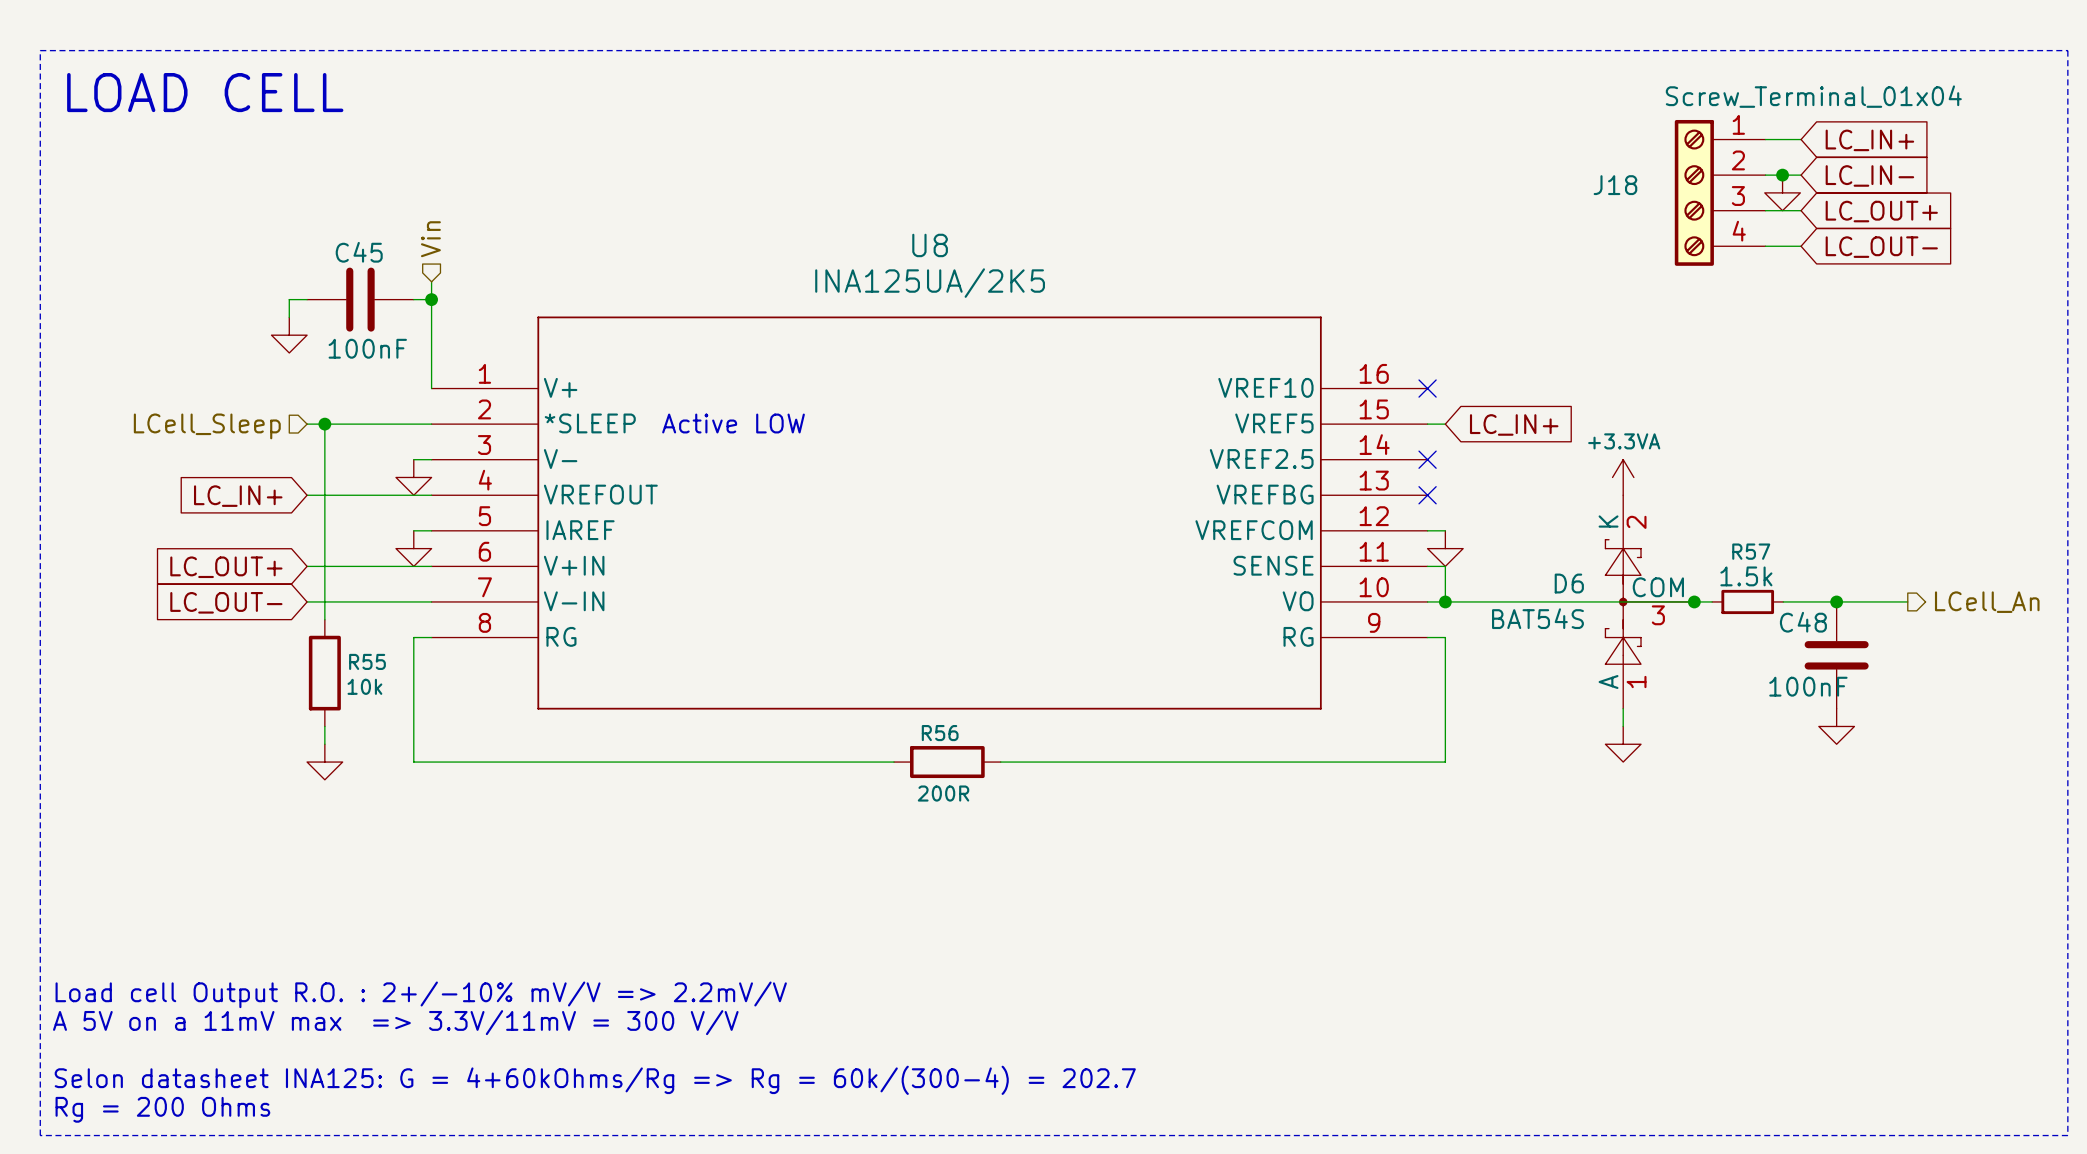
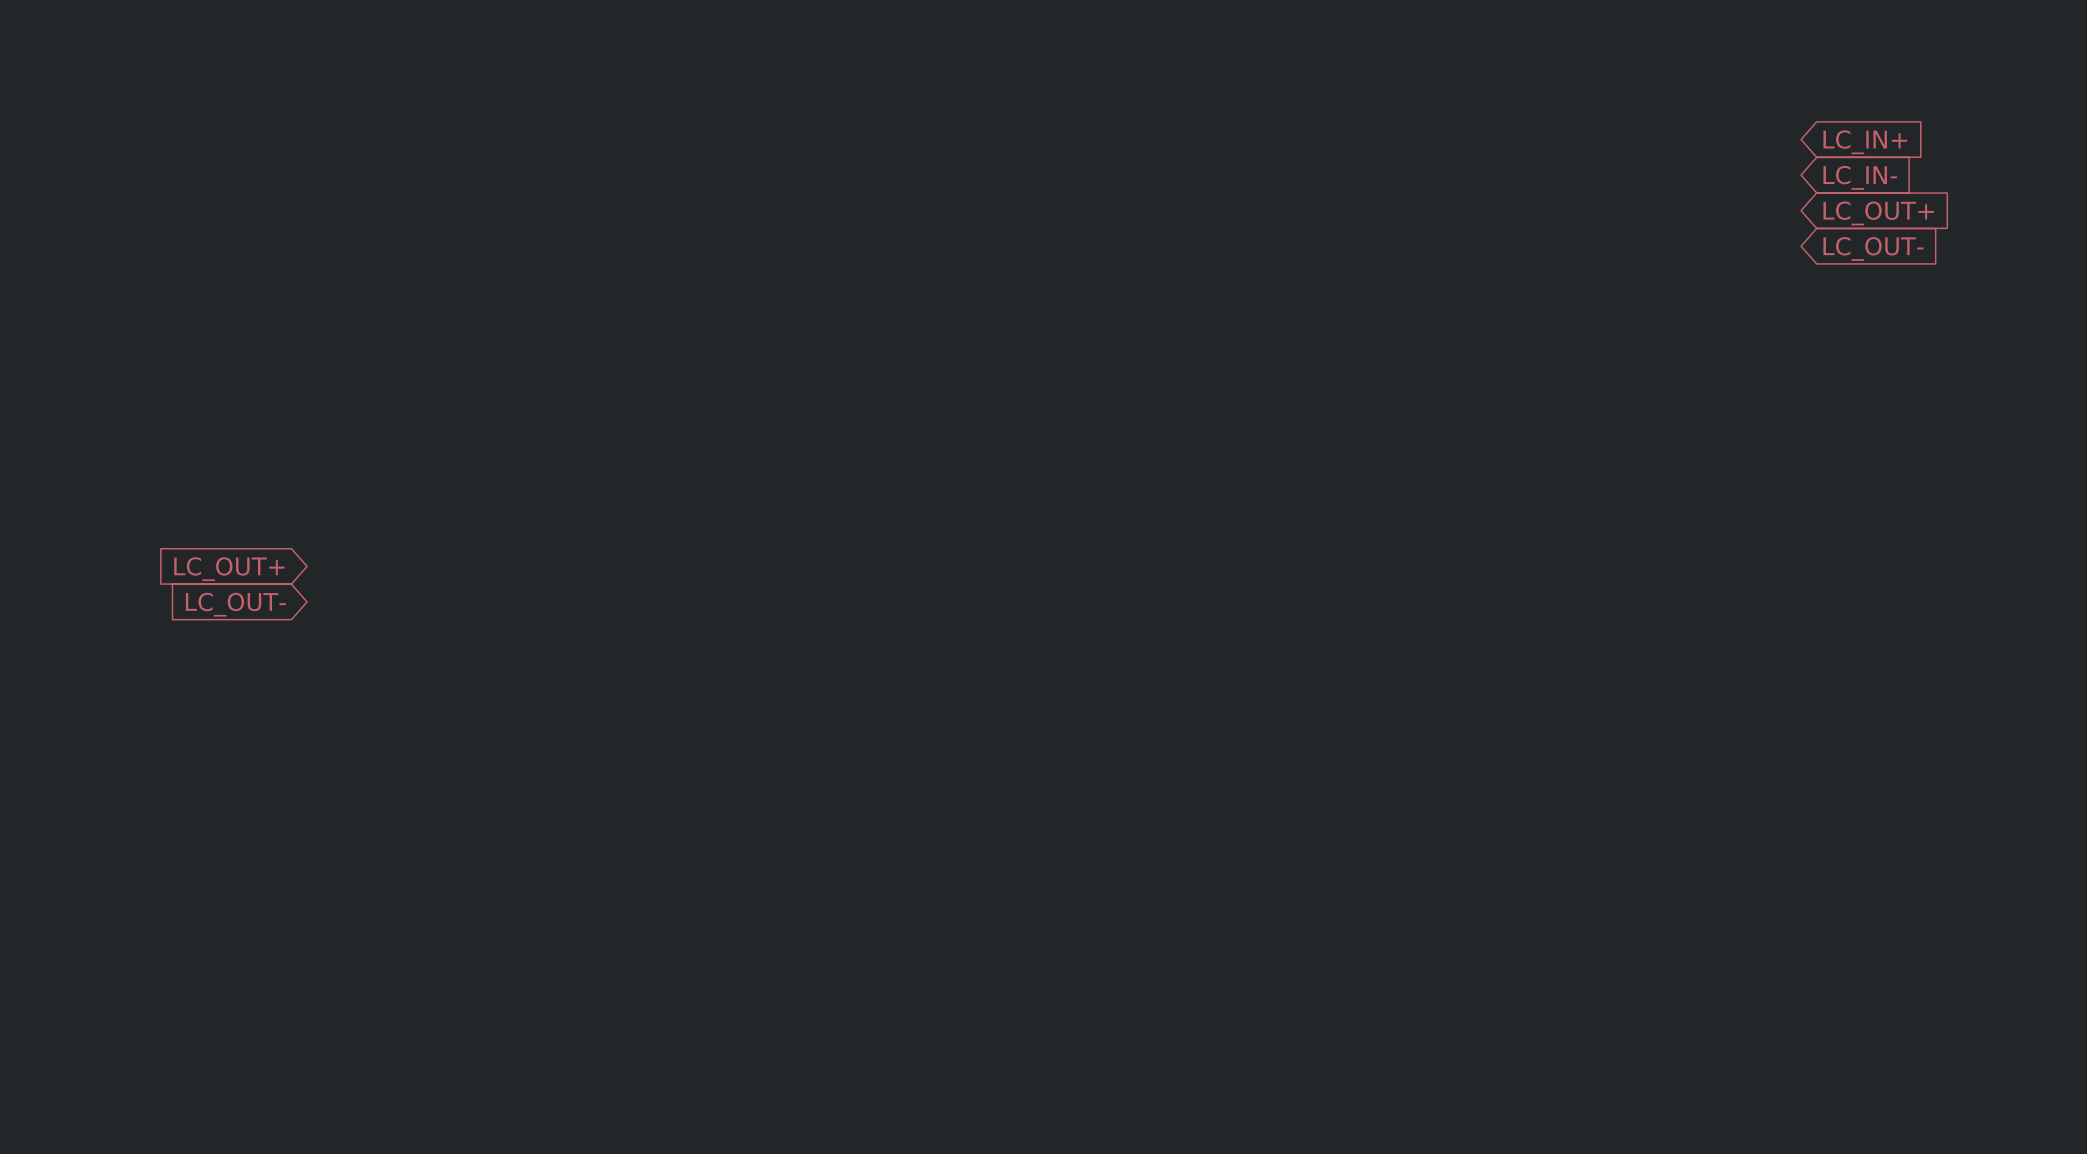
line: (40, 50) (40, 1135) (2067, 1135) (2067, 50) (40, 50) -> none
text: LOAD CELL (205, 92) -> none
wire: (1765, 139) (1801, 139) -> none
wire: (1765, 175) (1801, 175) -> none
junction: (1782, 175) -> none
J18: Screw_Terminal_01x04 (1720, 192) -> none
power symbol: (1782, 192) -> none
wire: (1765, 210) (1801, 210) -> none
hierarchical label: Vin (430, 239) -> none
wire: (1765, 246) (1801, 246) -> none
wire: (431, 281) (431, 388) -> none
wire: (307, 299) (289, 299) (289, 317) -> none
C45: 100nF (360, 299) -> none
wire: (413, 299) (431, 299) -> none
junction: (431, 299) -> none
power symbol: (289, 335) -> none
no-connect mark: (1427, 388) -> none
text: Active LOW (733, 423) -> none
wire: (307, 424) (431, 424) -> none
wire: (324, 424) (324, 619) -> none
junction: (324, 424) -> none
wire: (1427, 424) (1445, 424) -> none
global label: LC_IN+ (1514, 424) -> none
hierarchical label: LCell_Sleep (207, 426) -> none
wire: (413, 459) (431, 459) -> none
no-connect mark: (1427, 459) -> none
power symbol: (413, 477) -> none
power symbol: +3.3VA (1623, 477) -> none
wire: (307, 495) (431, 495) -> none
no-connect mark: (1427, 495) -> none
global label: LC_IN+ (238, 496) -> none
U8: INA125UA/2K5 (929, 513) -> none
wire: (413, 530) (431, 530) -> none
wire: (1427, 530) (1445, 530) -> none
power symbol: (413, 548) -> none
power symbol: (1445, 548) -> none
wire: (307, 566) (431, 566) -> none
wire: (1427, 566) (1445, 566) (1445, 601) -> none
wire: (307, 601) (431, 601) -> none
wire: (1427, 601) (1712, 601) -> none
junction: (1445, 601) -> none
D6: BAT54S (1649, 601) -> none
junction: (1694, 601) -> none
R57: 1.5k (1747, 601) -> none
wire: (1783, 601) (1907, 601) -> none
junction: (1836, 601) -> none
hierarchical label: LCell_An (1987, 602) -> none
wire: (431, 637) (413, 637) (413, 762) (894, 762) -> none
wire: (1427, 637) (1445, 637) (1445, 762) (1000, 762) -> none
C48: 100nF (1836, 655) -> none
R55: 10k (324, 673) -> none
wire: (1623, 708) (1623, 726) -> none
wire: (324, 726) (324, 744) -> none
power symbol: (1836, 726) -> none
power symbol: (1623, 744) -> none
power symbol: (324, 762) -> none
R56: 200R (947, 762) -> none
text: Load cell Output R.O. : 2+/-10% mV/V => 2.2mV/V (421, 994) -> none
text: A 5V on a 11mV max => 3.3V/11mV = 300 V/V (395, 1022) -> none
text: Selon datasheet INA125: G = 4+60kOhms/Rg => Rg = 60k/(300-4) = 202.7 (595, 1080) -> none
text: Rg = 200 Ohms (162, 1109) -> none

